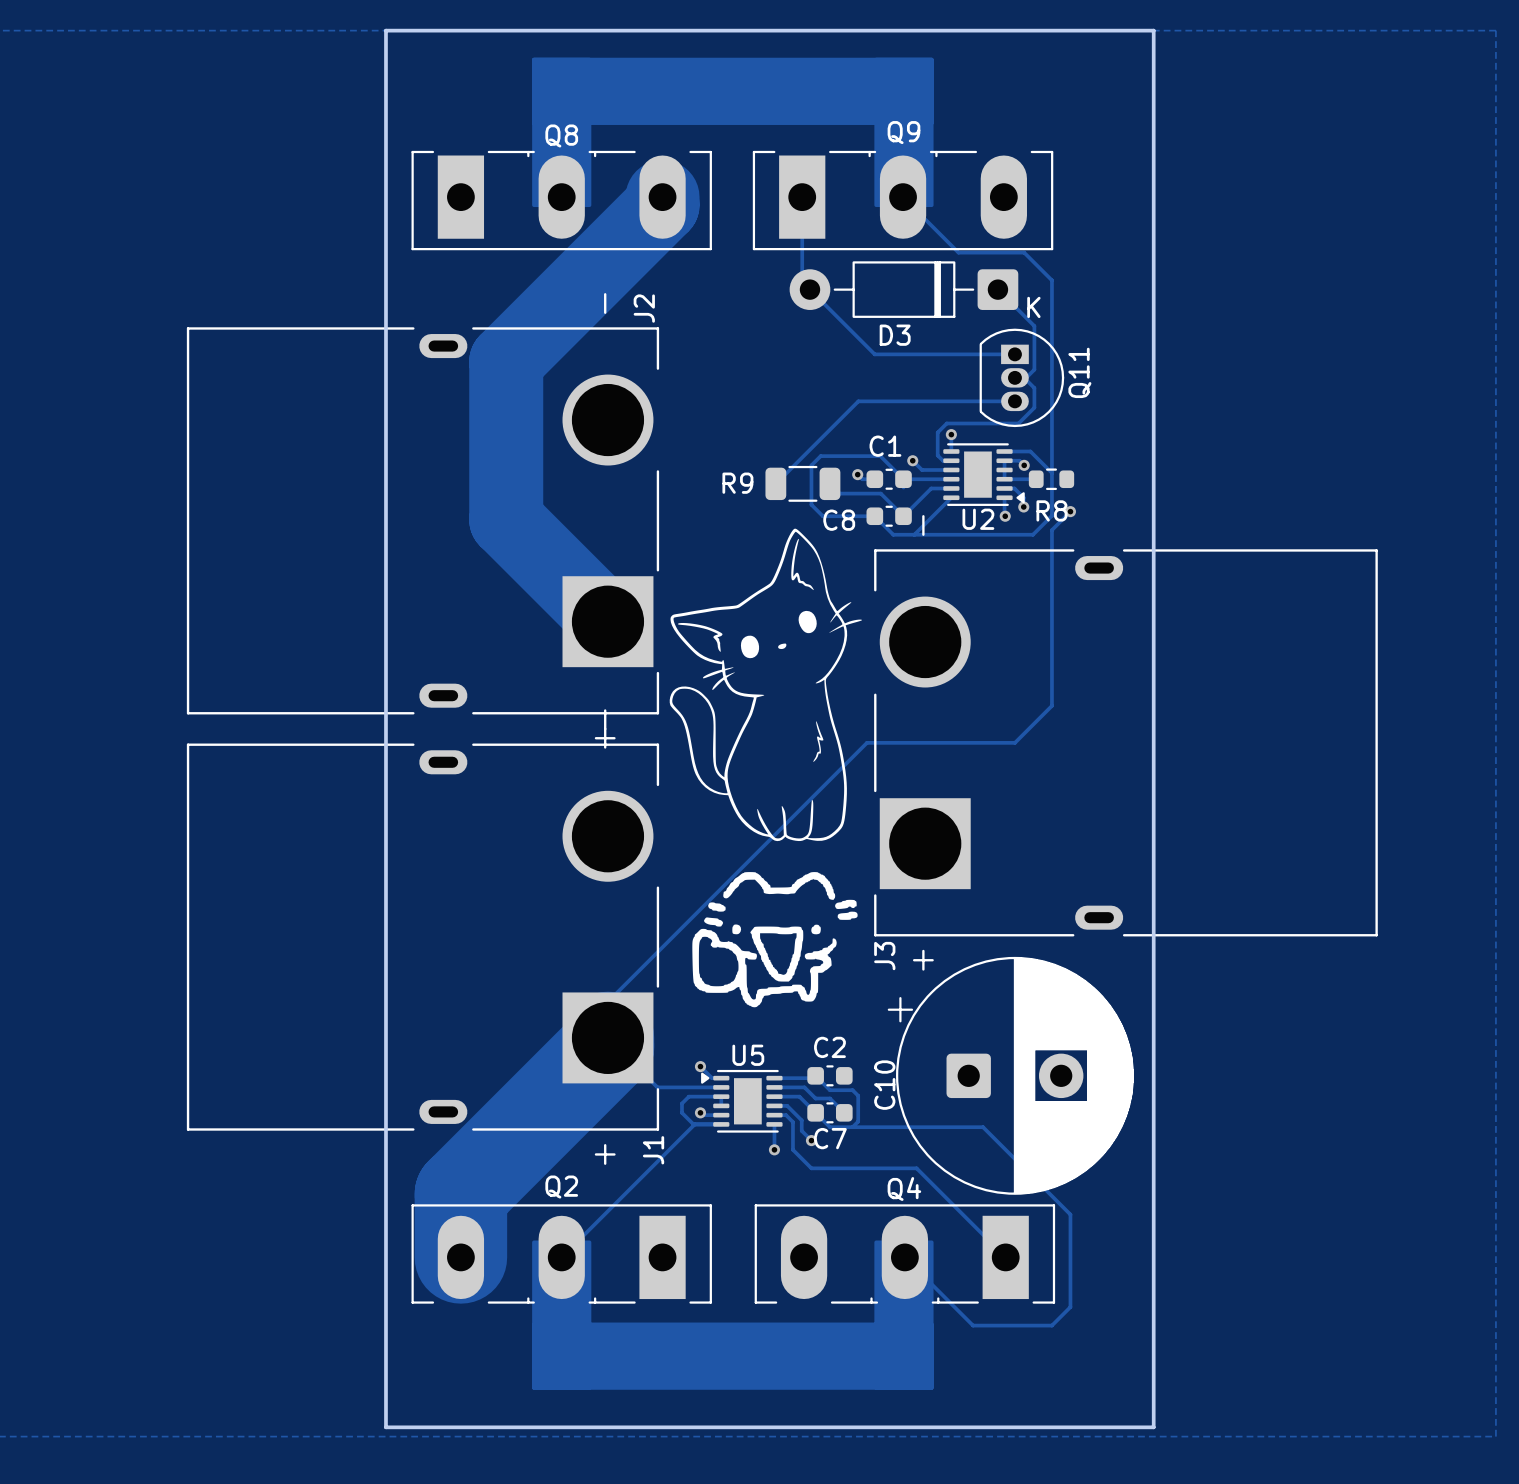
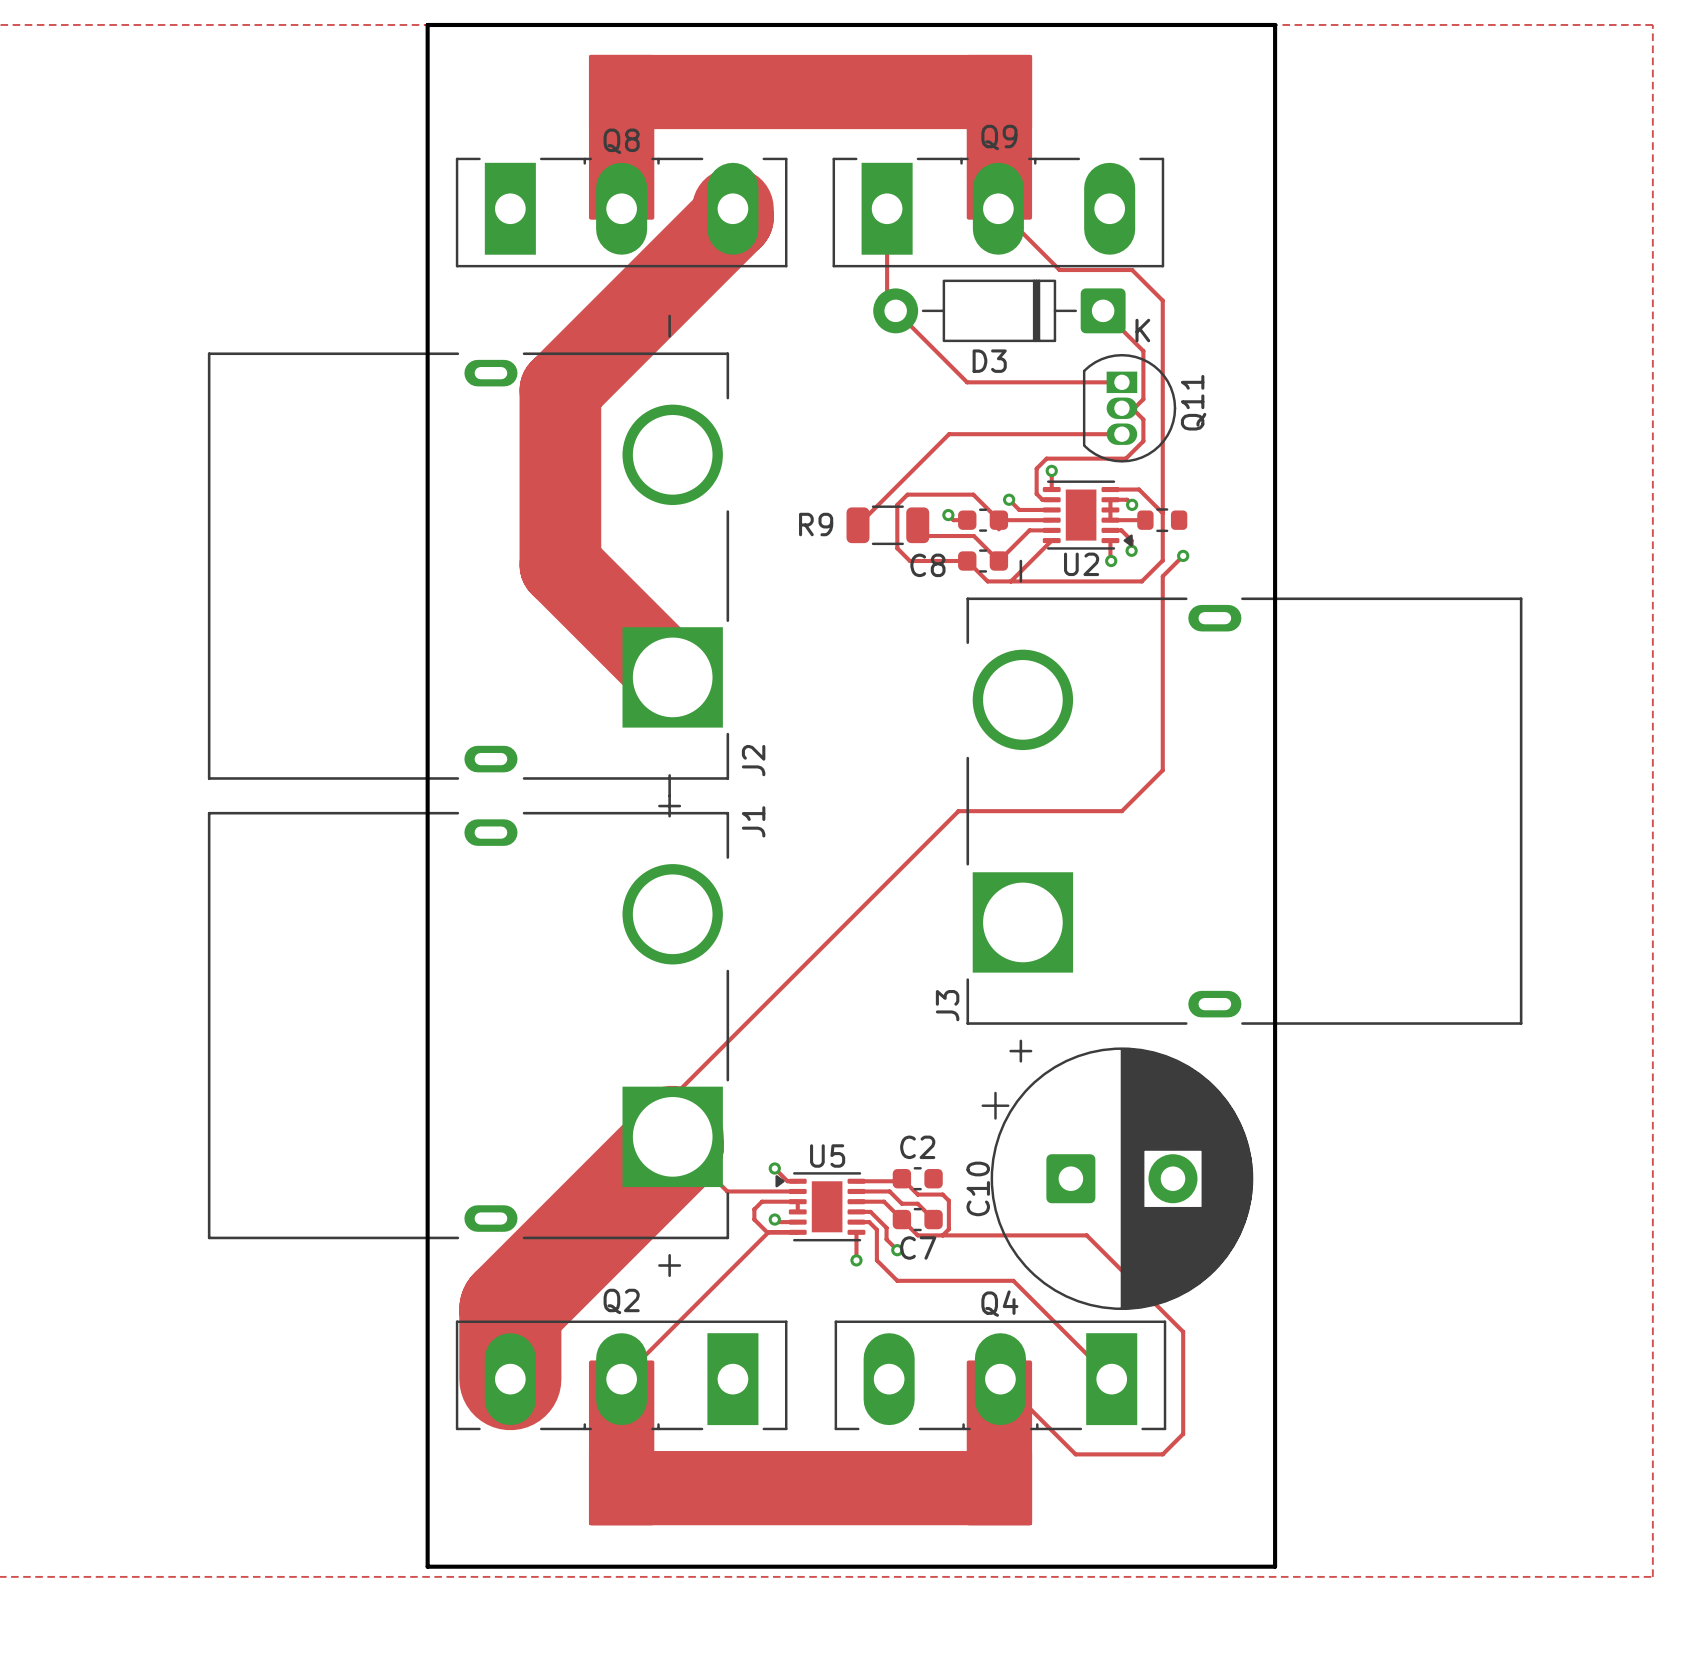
J2 name position: J2 (644, 308) -> J2 (753, 760)
text: C1 (885, 446) -> none
text: R8 (1051, 510) -> none
drawing: [669, 528, 863, 842] -> none
drawing: [692, 872, 858, 1008] -> none
J3 name position: J3 (884, 956) -> J3 (947, 1005)
J1 name position: J1 (653, 1150) -> J1 (753, 821)

